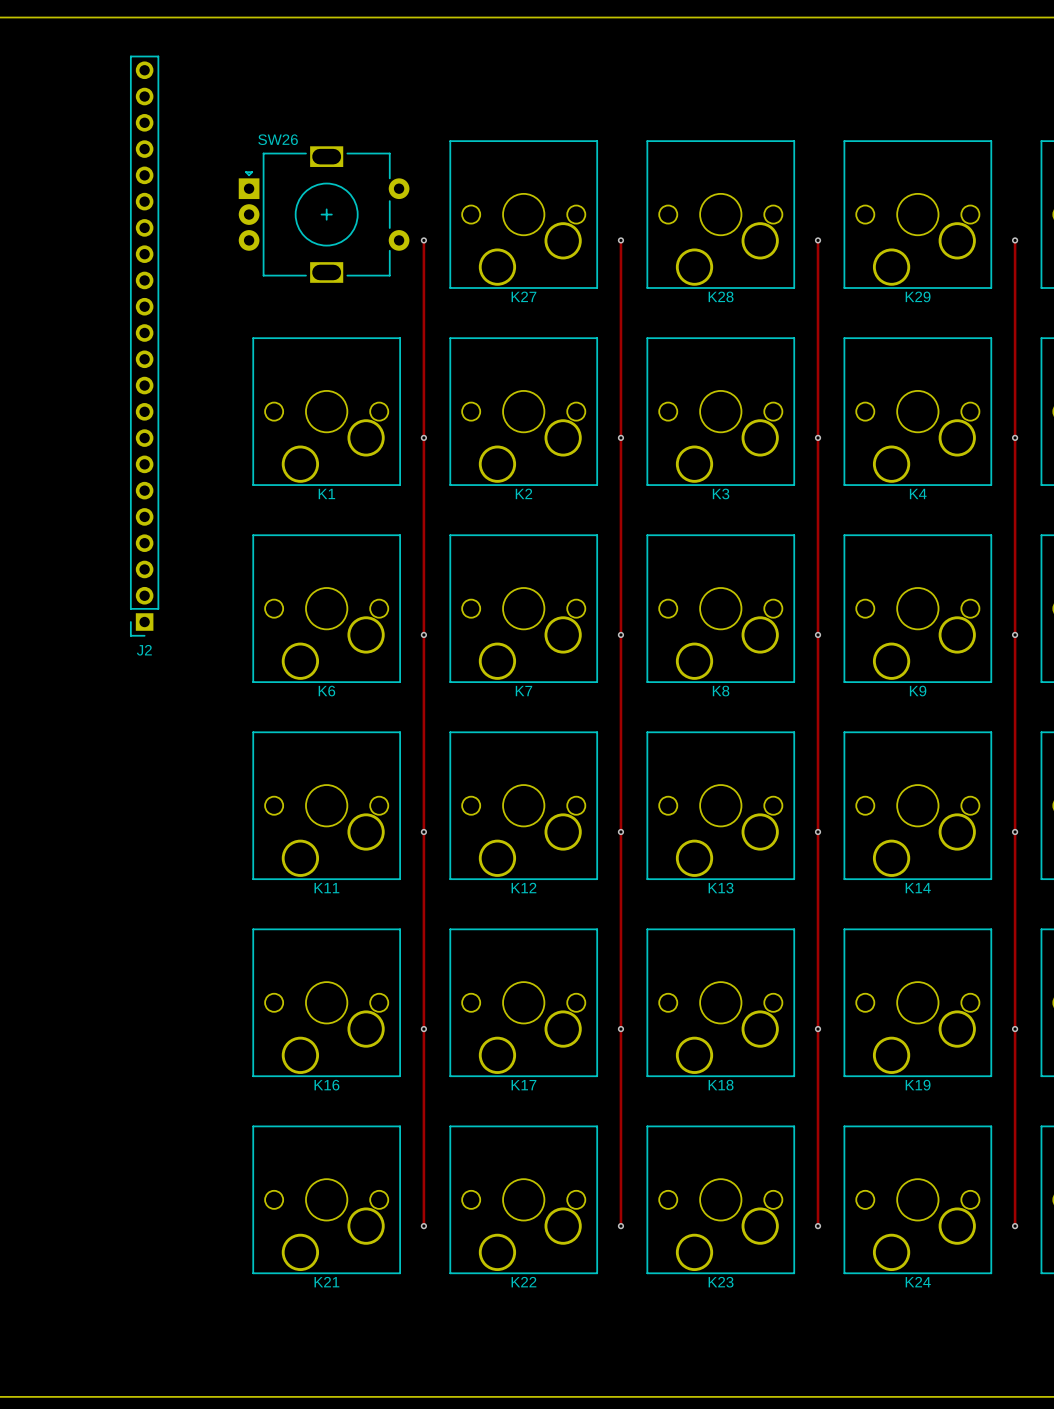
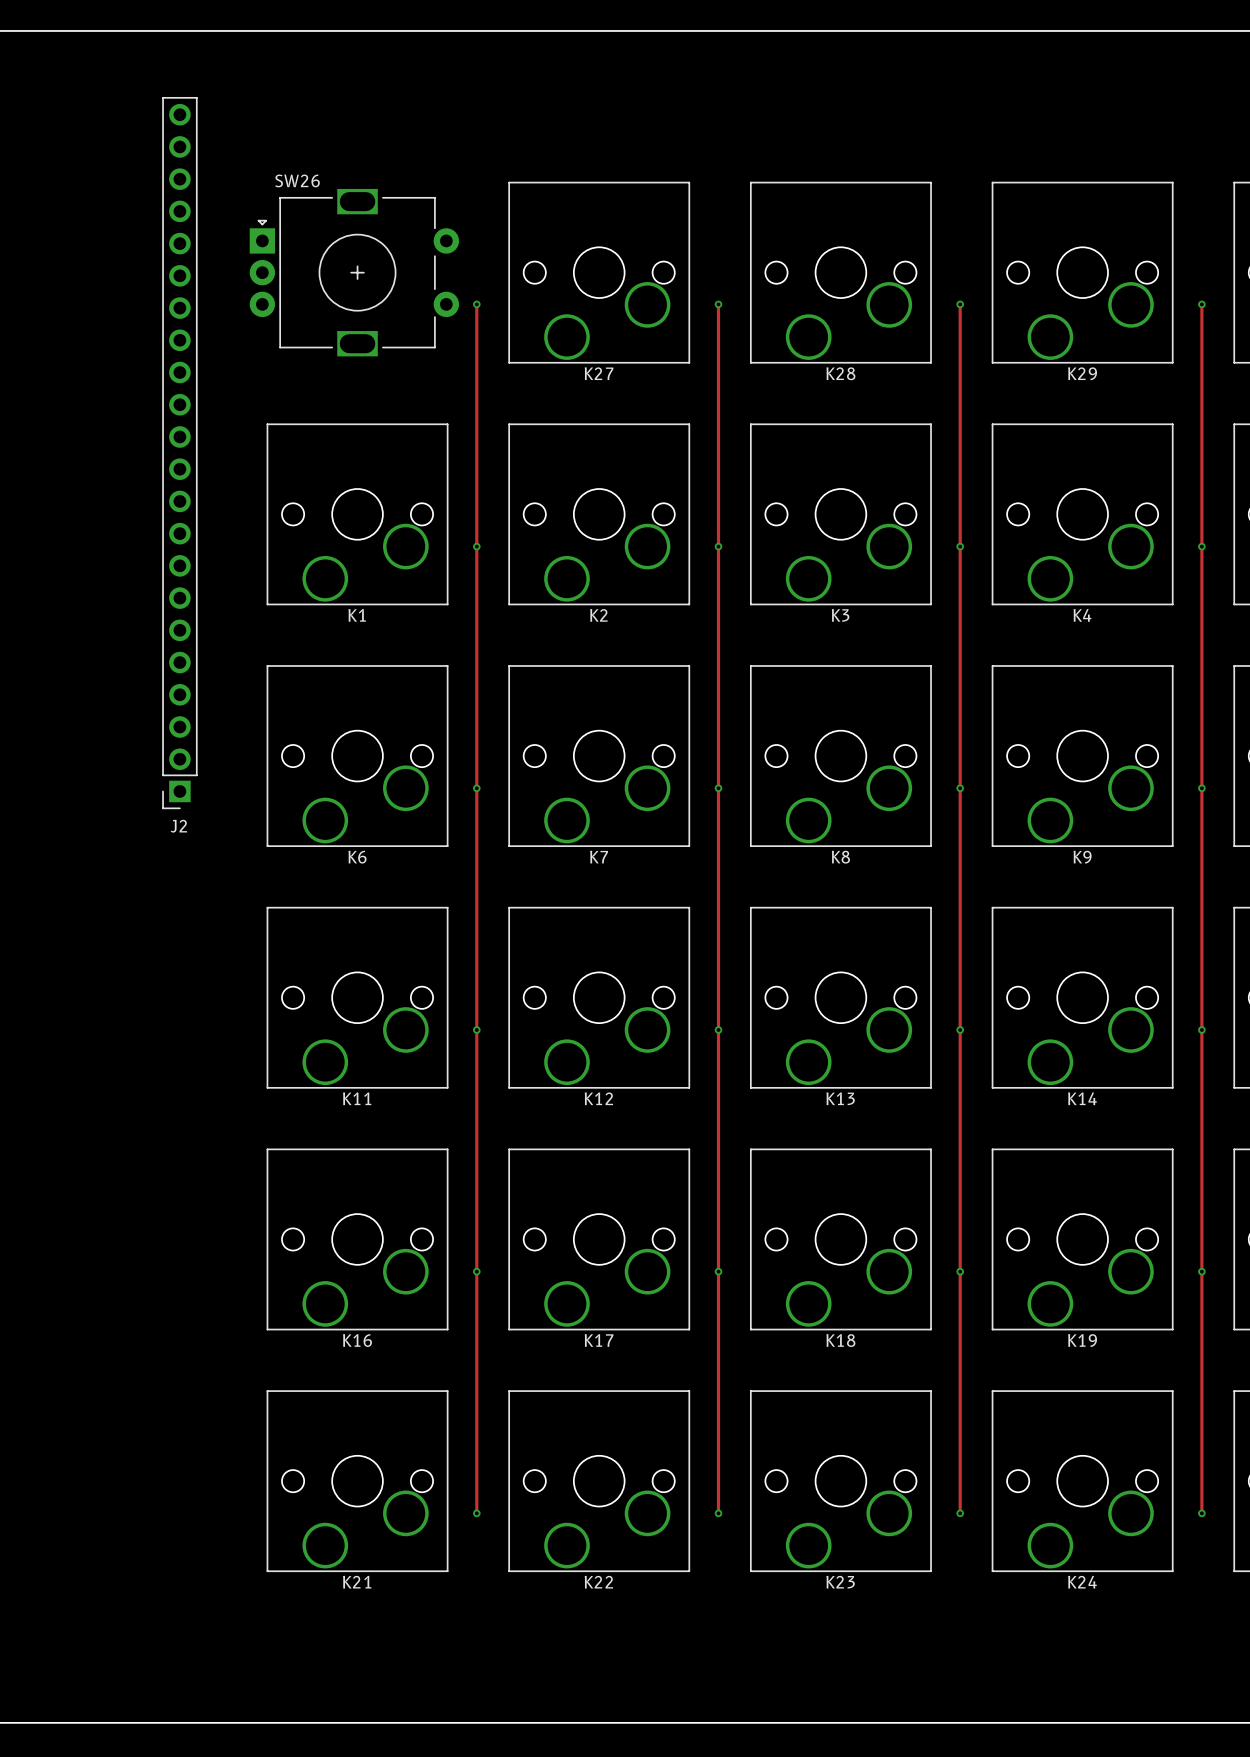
J2 position: (144, 346) -> (179, 453)

